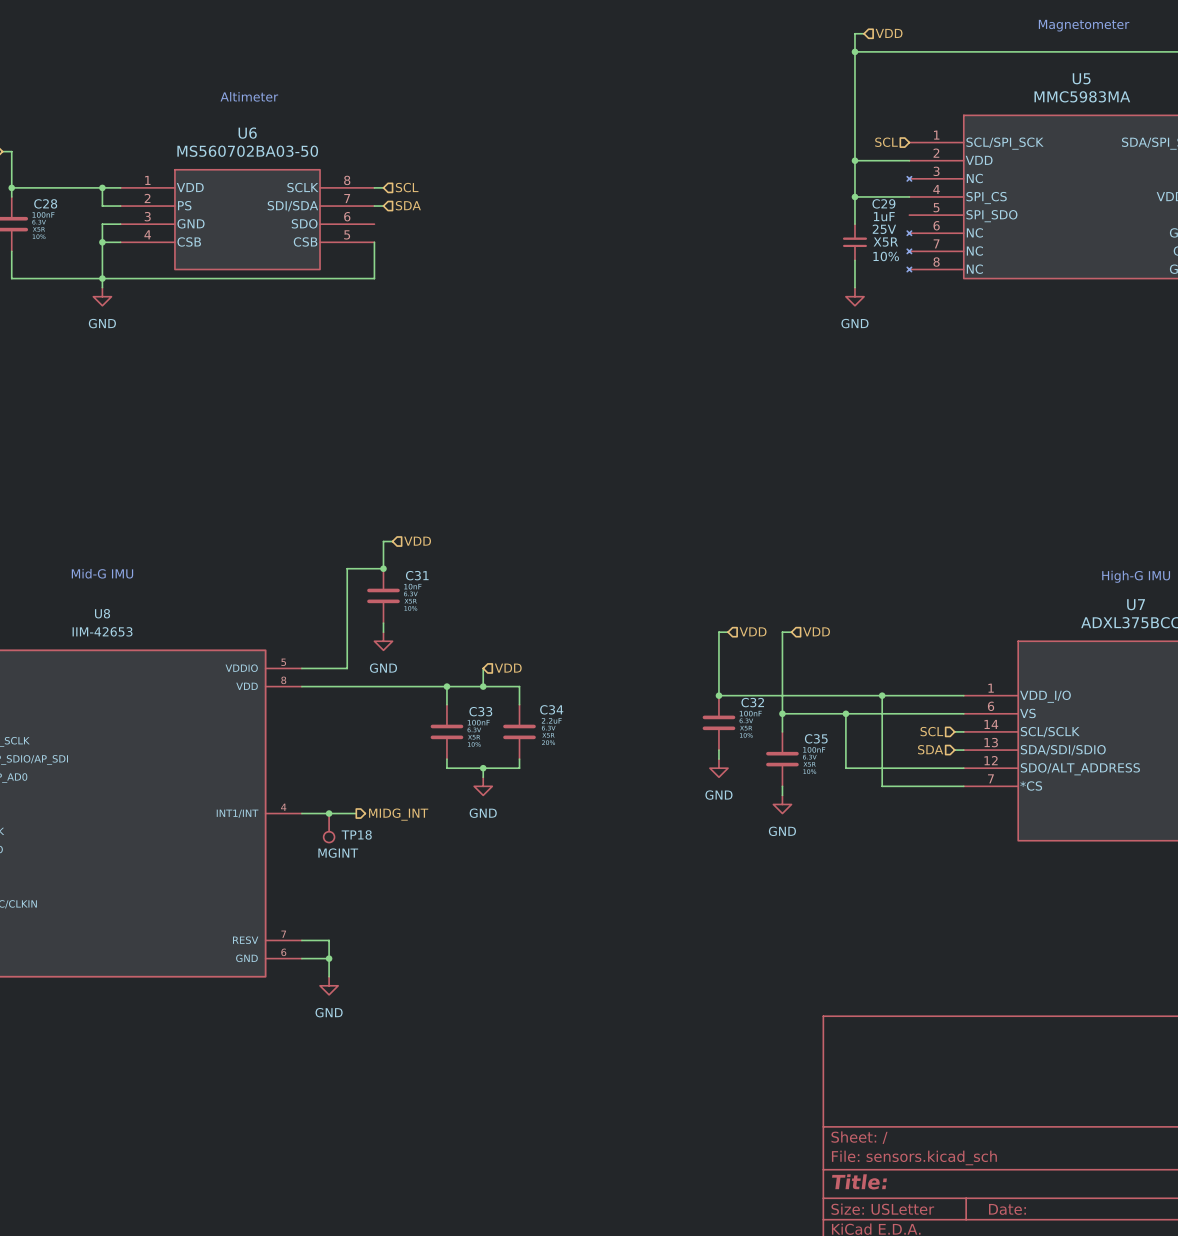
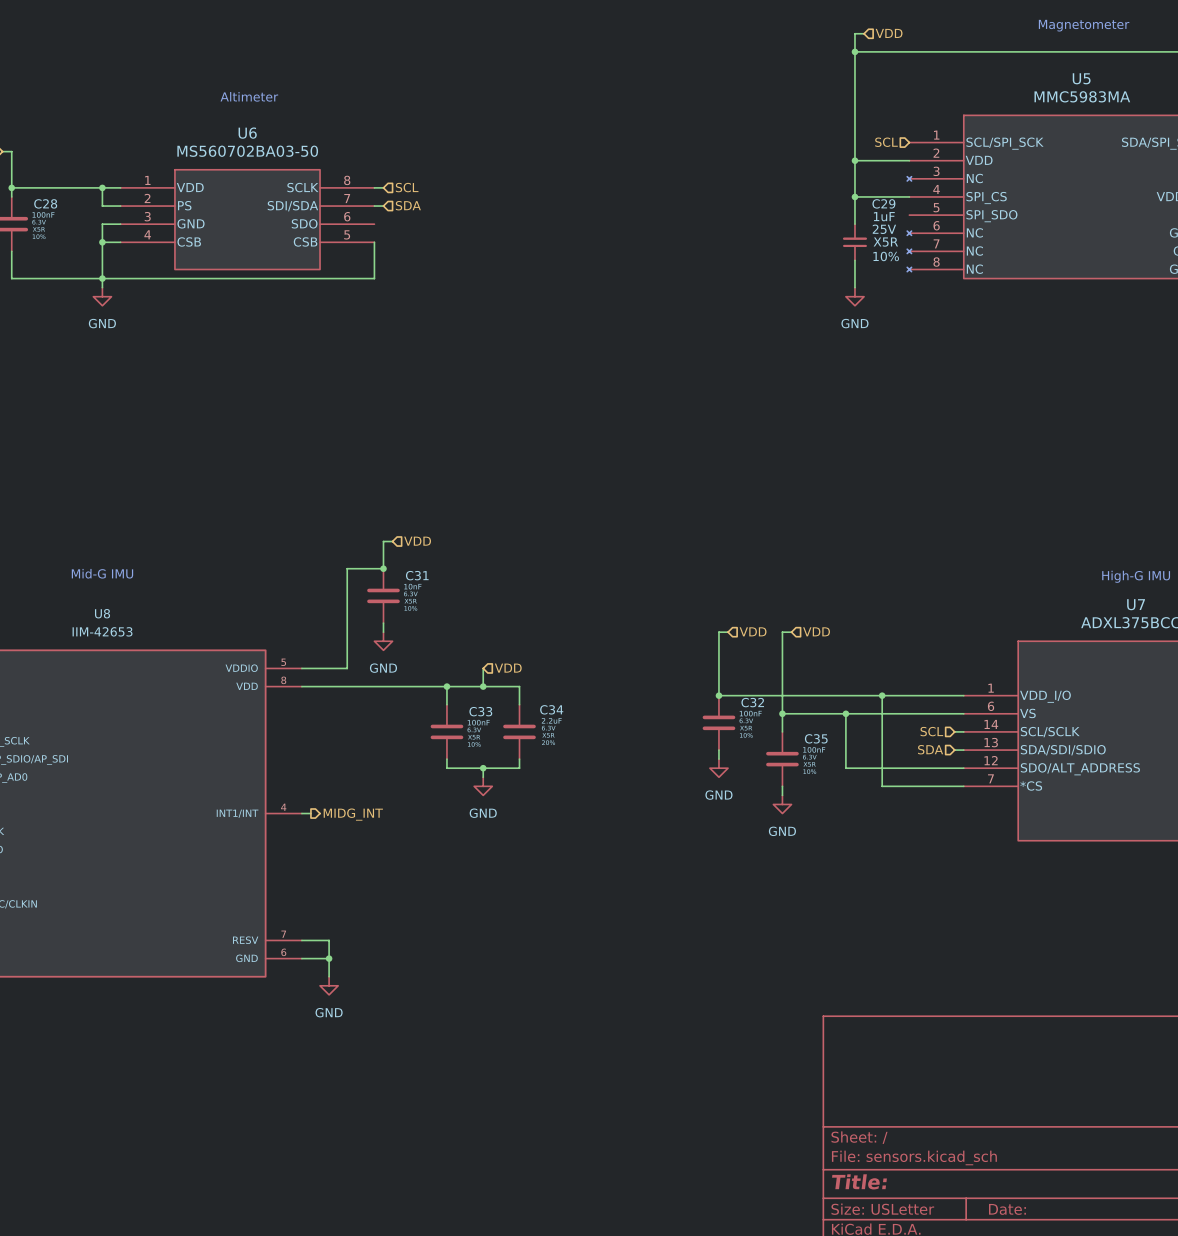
wire: (310, 813) (356, 813) -> none
junction: (329, 813) -> none
hierarchical label position: MIDG_INT (398, 814) -> MIDG_INT (353, 814)
TP18: MGINT (329, 828) -> none

